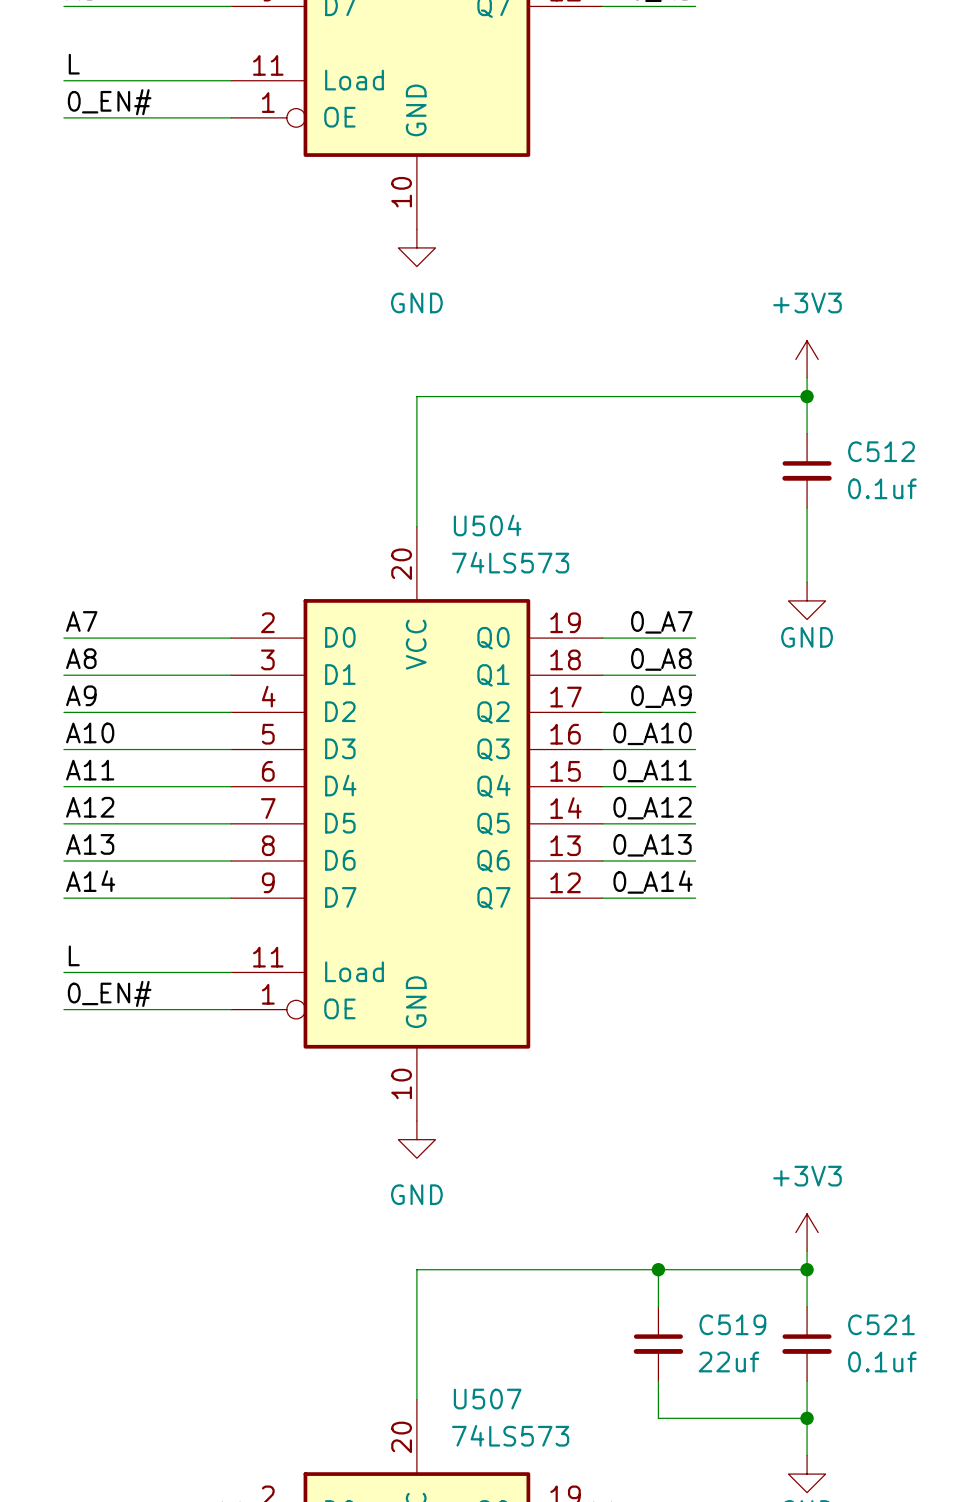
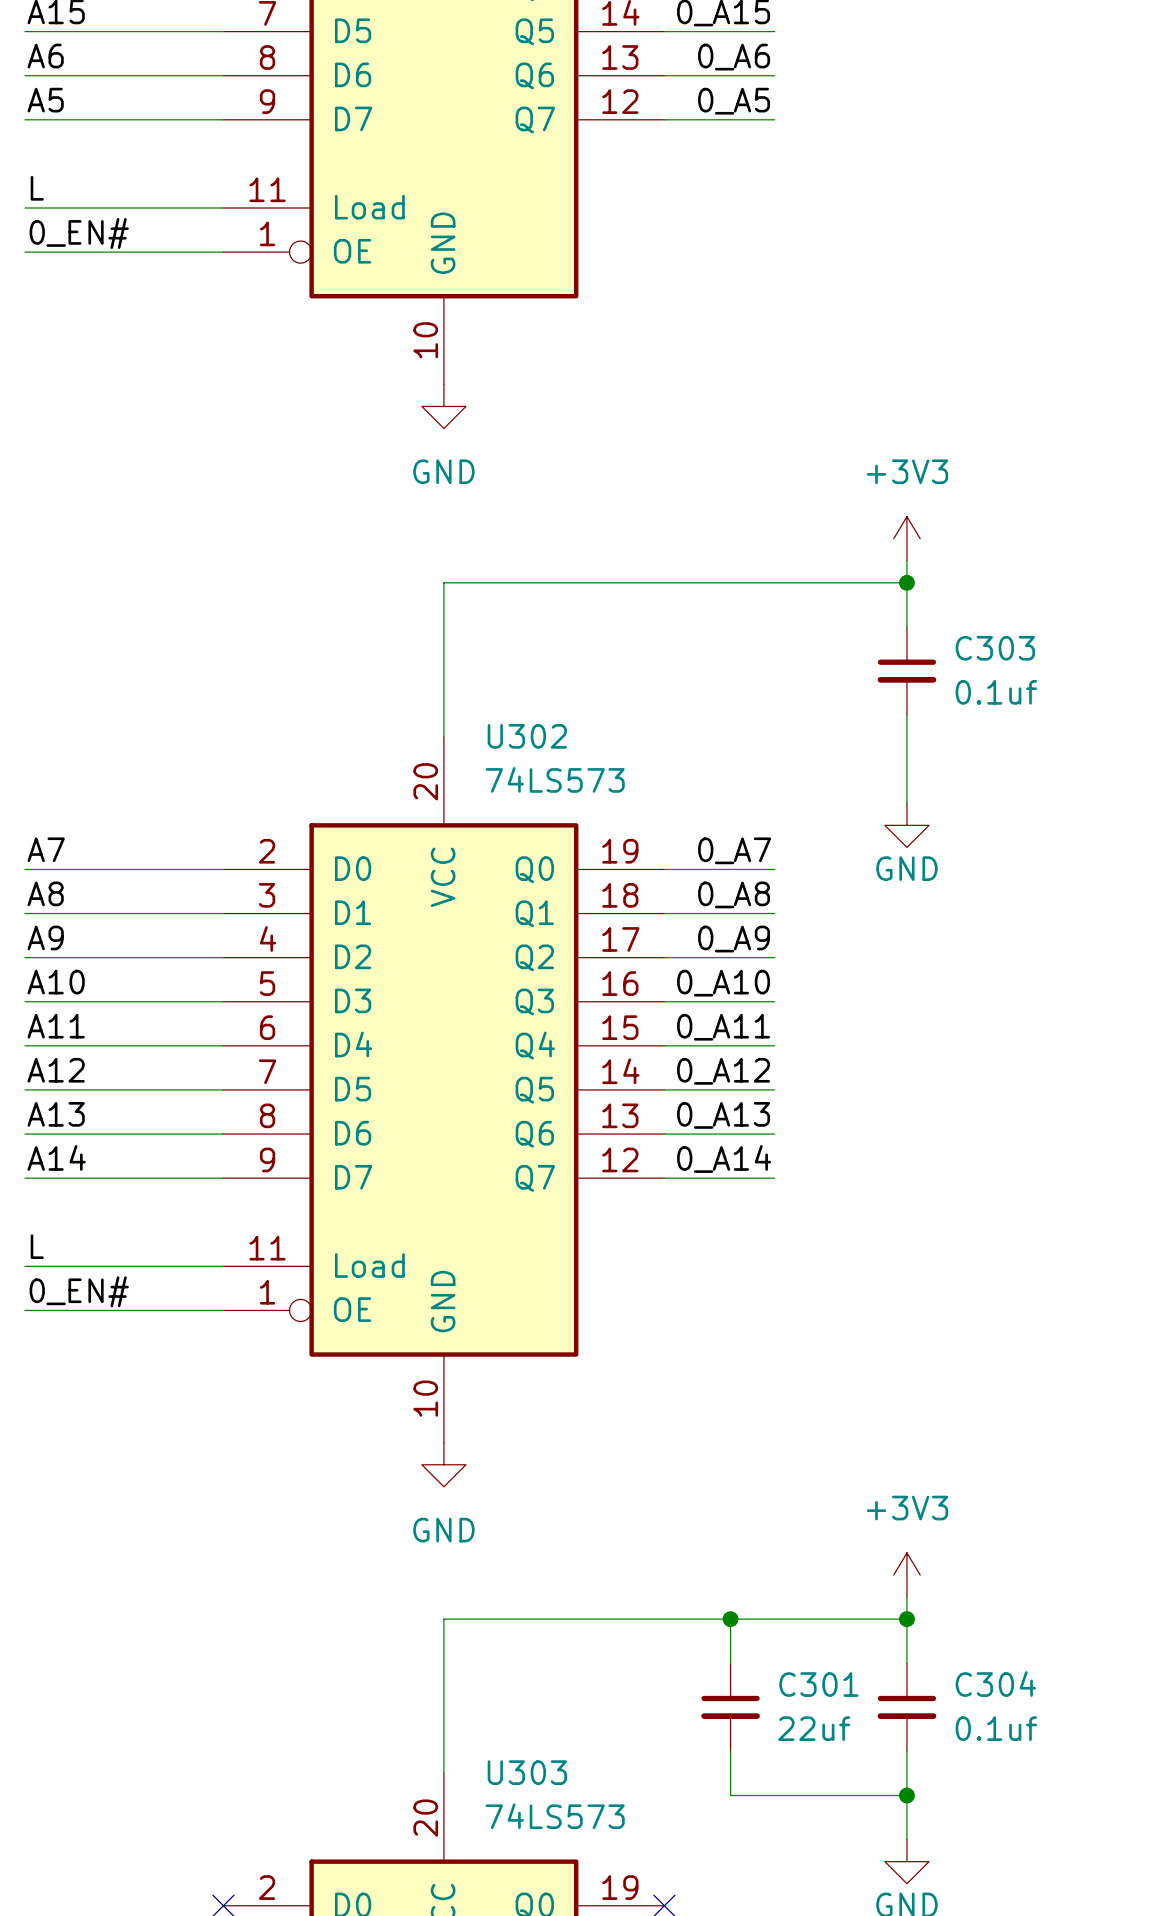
C512 name: C512 (881, 451) -> C303 (995, 648)
U504 name: U504 (487, 525) -> U302 (527, 736)
C519 name: C519 (732, 1324) -> C301 (818, 1684)
C521 name: C521 (881, 1324) -> C304 (995, 1684)
U507 name: U507 (487, 1399) -> U303 (527, 1772)

